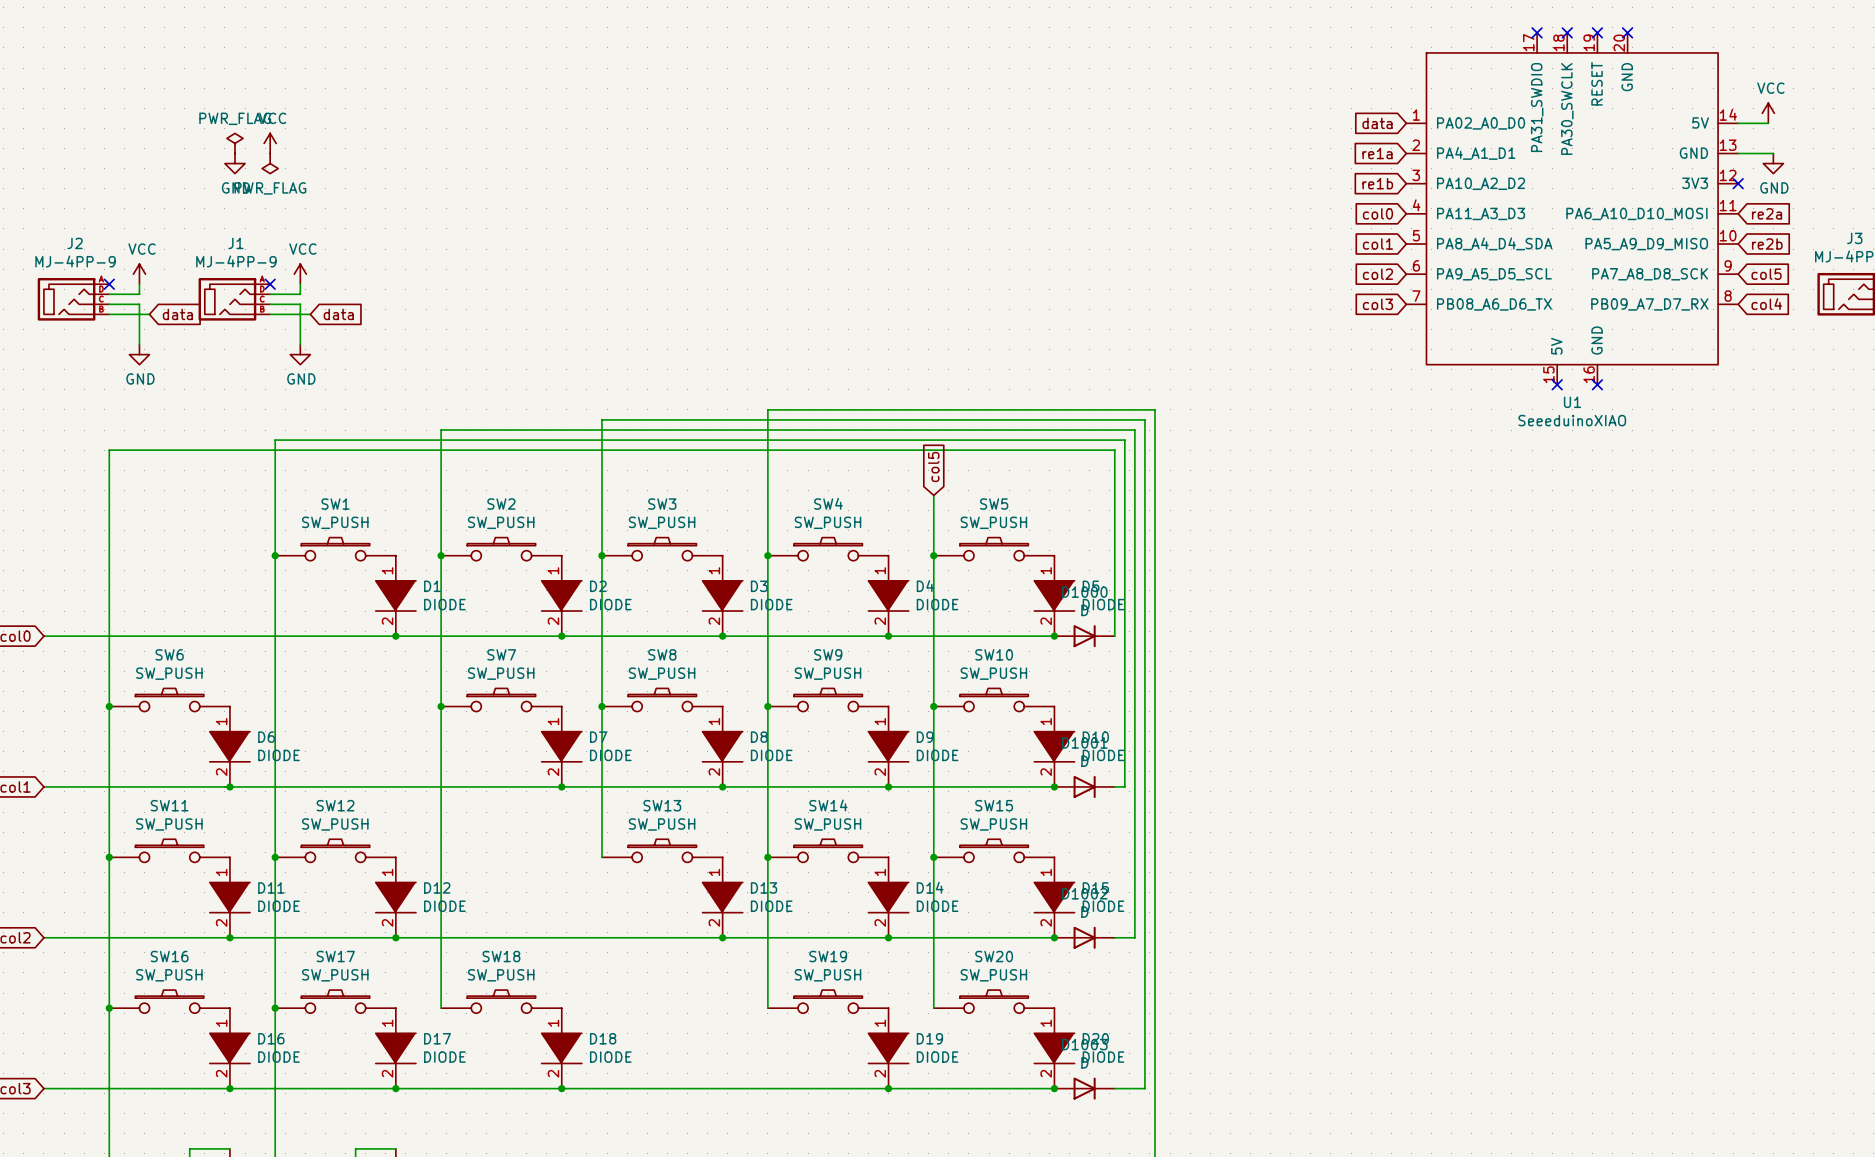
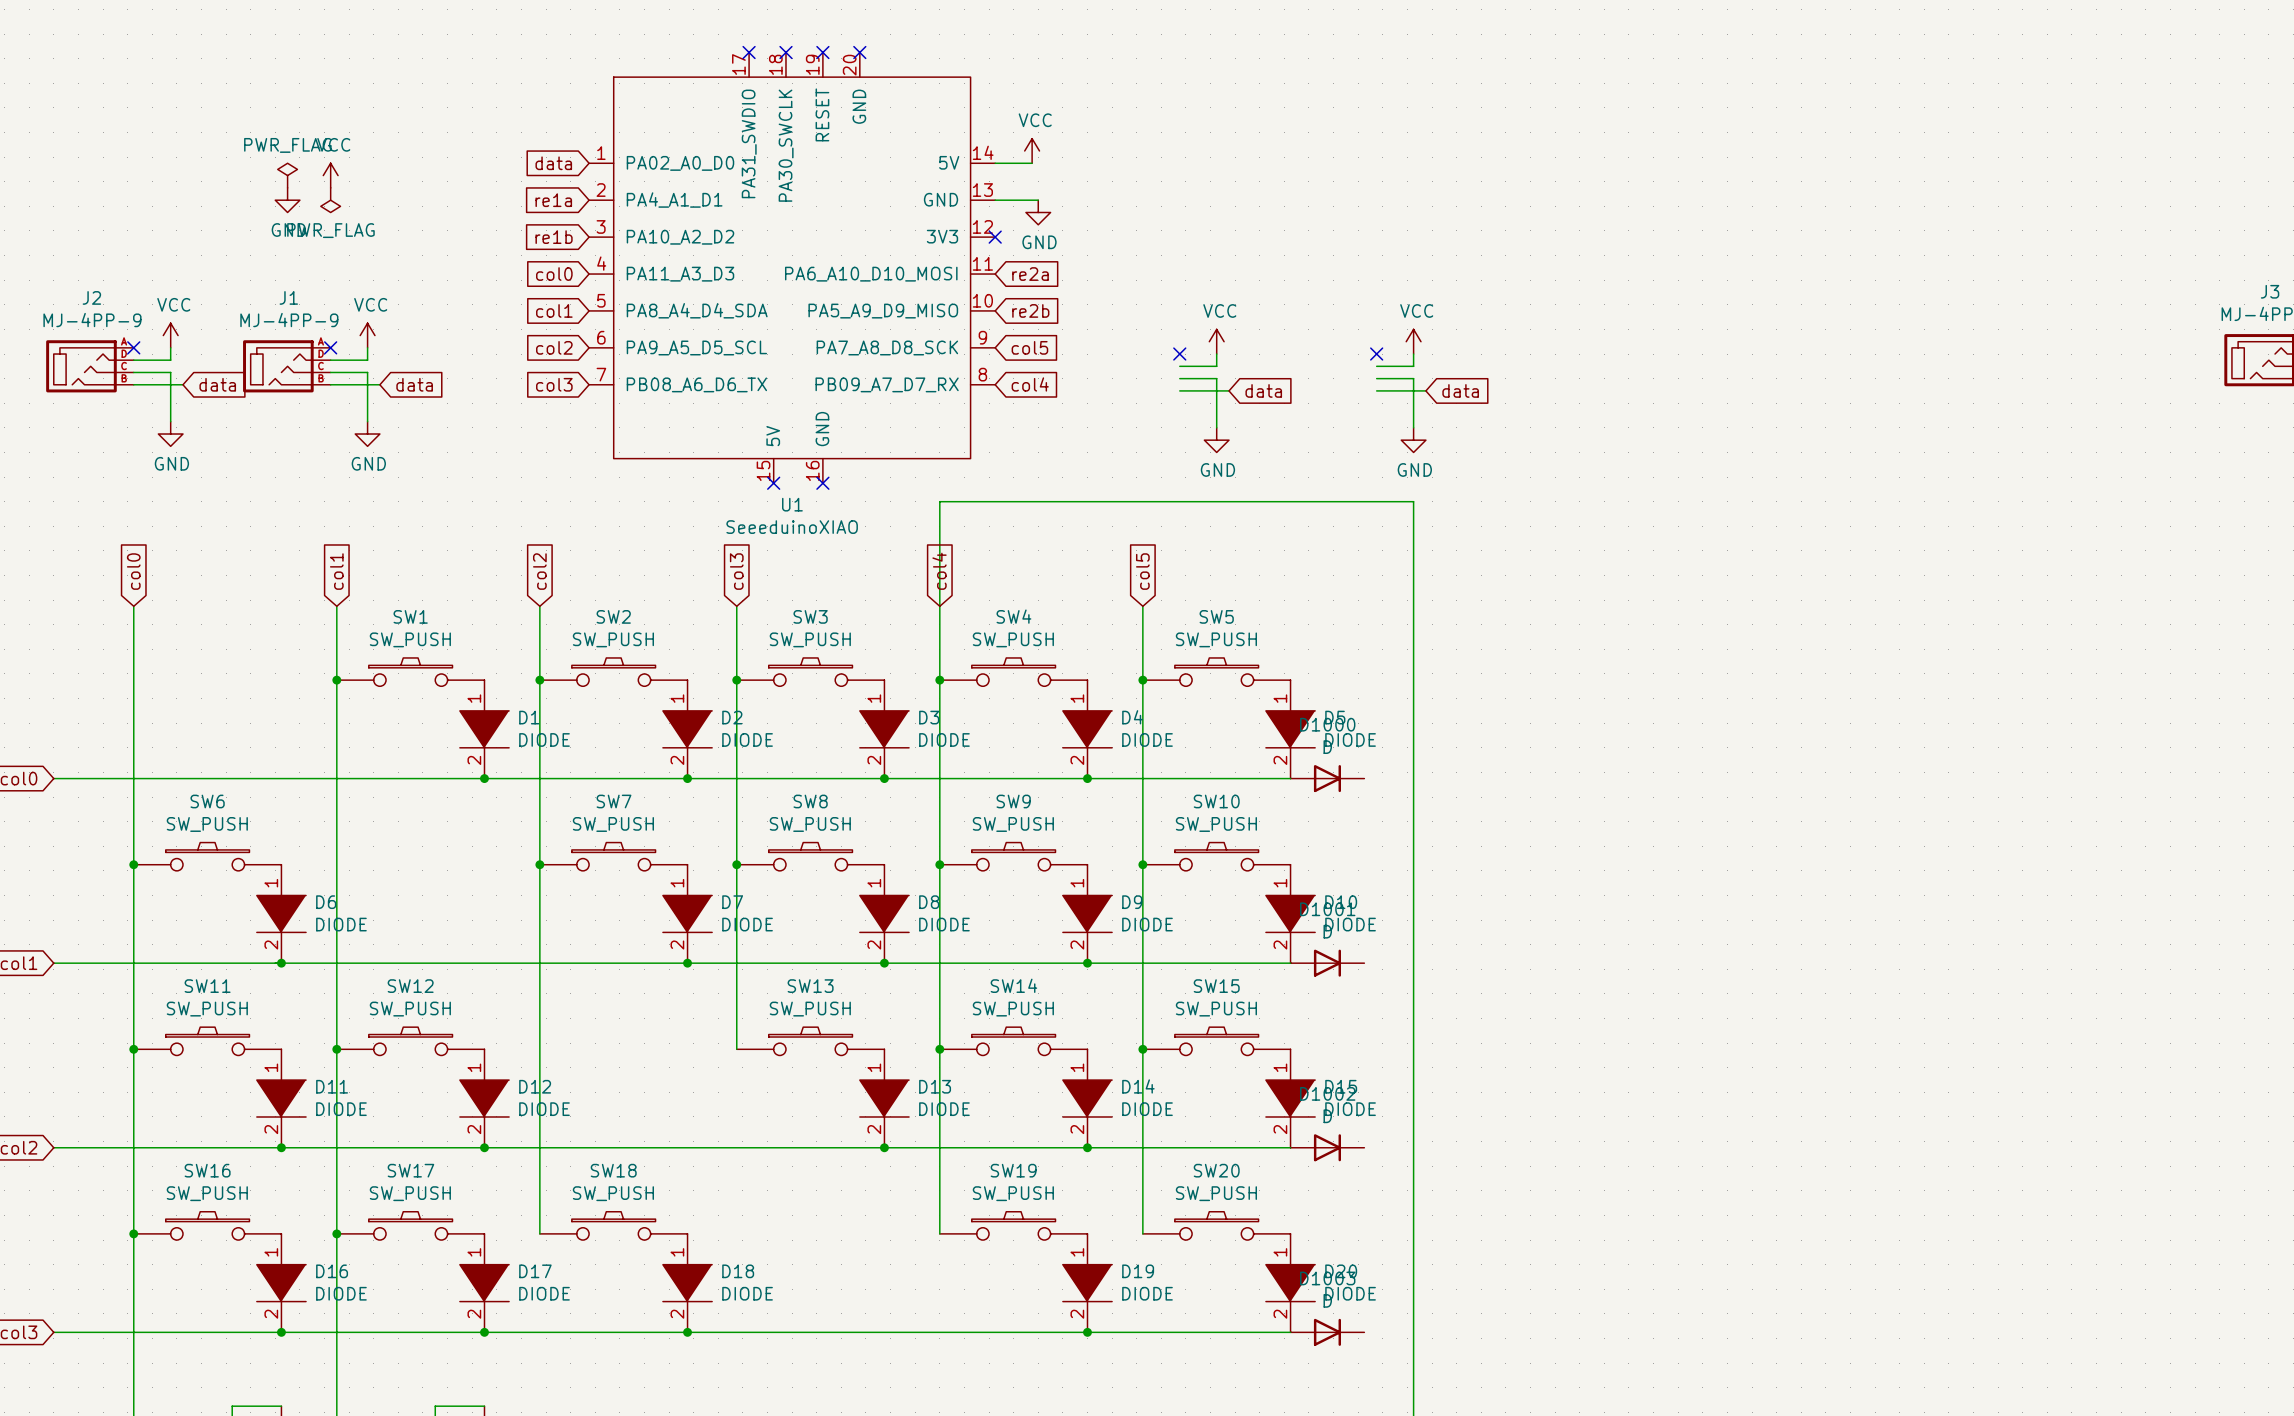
no-connect mark: (1537, 32) -> none
no-connect mark: (1567, 32) -> none
no-connect mark: (1597, 32) -> none
no-connect mark: (1627, 32) -> none
no-connect mark: none -> (749, 52)
no-connect mark: none -> (785, 52)
no-connect mark: none -> (822, 52)
no-connect mark: none -> (859, 52)
power symbol: VCC (1768, 113) -> none
power symbol: none -> VCC (1032, 150)
global label: data (1377, 123) -> none
wire: (1738, 123) (1768, 123) -> none
global label: none -> data (553, 163)
wire: none -> (995, 163) (1032, 163)
global label: re1a (1377, 153) -> none
wire: (1738, 153) (1773, 153) -> none
global label: none -> re1a (553, 200)
wire: none -> (995, 200) (1038, 200)
power symbol: GND (1773, 163) -> none
power symbol: none -> GND (1038, 212)
global label: re1b (1377, 183) -> none
no-connect mark: (1738, 183) -> none
global label: none -> re1b (554, 237)
no-connect mark: none -> (995, 237)
U1 position: (1572, 208) -> (792, 267)
global label: col0 (1377, 213) -> none
global label: re2a (1767, 213) -> none
global label: none -> col0 (554, 274)
global label: none -> re2a (1030, 274)
global label: col1 (1377, 244) -> none
global label: re2b (1767, 244) -> none
global label: none -> col1 (554, 310)
global label: none -> re2b (1030, 310)
global label: col2 (1377, 274) -> none
global label: col5 (1766, 274) -> none
power symbol: none -> VCC (1216, 341)
power symbol: none -> VCC (1413, 341)
global label: none -> col2 (554, 347)
global label: none -> col5 (1029, 347)
no-connect mark: none -> (1179, 354)
wire: none -> (1216, 354) (1216, 366) (1179, 366)
no-connect mark: none -> (1376, 354)
wire: none -> (1413, 354) (1413, 366) (1376, 366)
global label: col3 (1377, 304) -> none
global label: col4 (1766, 304) -> none
wire: none -> (1179, 378) (1216, 378) (1216, 427)
wire: none -> (1376, 378) (1413, 378) (1413, 427)
global label: none -> col3 (554, 384)
global label: none -> col4 (1030, 384)
wire: none -> (1179, 390) (1229, 390)
global label: none -> data (1263, 390)
wire: none -> (1376, 390) (1425, 390)
global label: none -> data (1460, 390)
power symbol: none -> GND (1216, 440)
power symbol: none -> GND (1413, 440)
no-connect mark: (1557, 384) -> none
no-connect mark: (1597, 384) -> none
no-connect mark: none -> (773, 483)
no-connect mark: none -> (822, 483)
global label: none -> col0 (133, 571)
global label: none -> col1 (336, 571)
global label: none -> col2 (539, 571)
global label: none -> col3 (736, 571)
global label: none -> col4 (939, 571)
wire: (109, 495) (109, 450) (1114, 450) (1114, 636) -> none
wire: (275, 495) (275, 440) (1124, 440) (1124, 786) (1114, 786) -> none
wire: (441, 495) (441, 430) (1134, 430) (1134, 937) (1114, 937) -> none
wire: (601, 495) (601, 419) (1144, 419) (1144, 1088) (1114, 1088) -> none
junction: (1054, 636) -> none
junction: (1054, 786) -> none
junction: (1054, 937) -> none
junction: (1054, 1088) -> none

